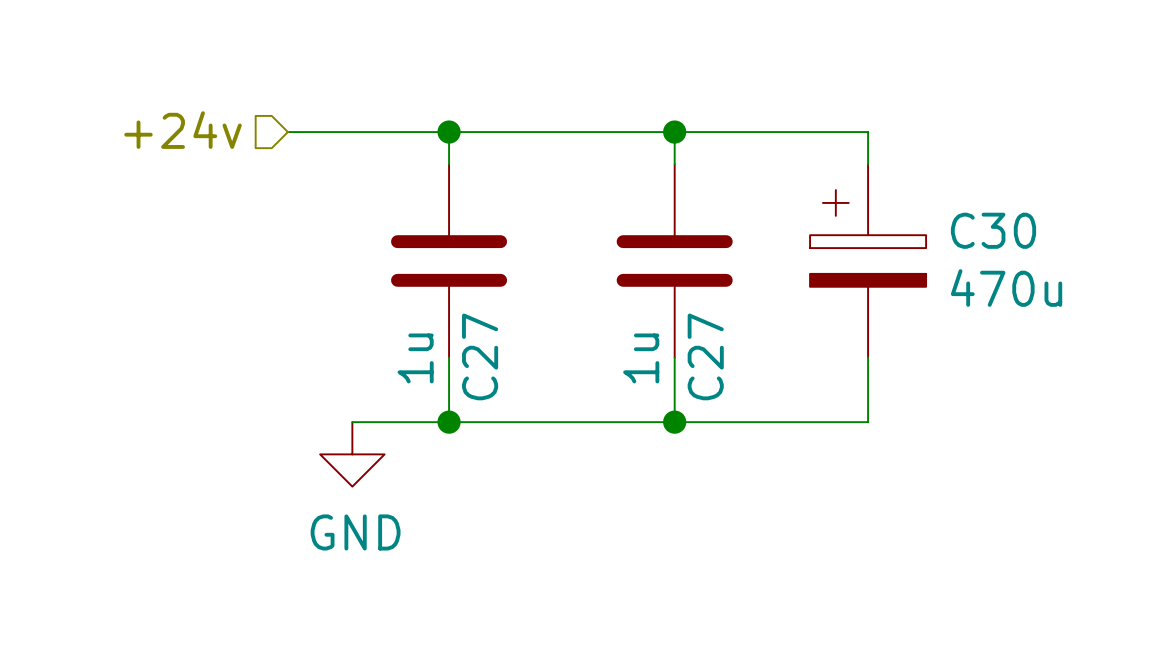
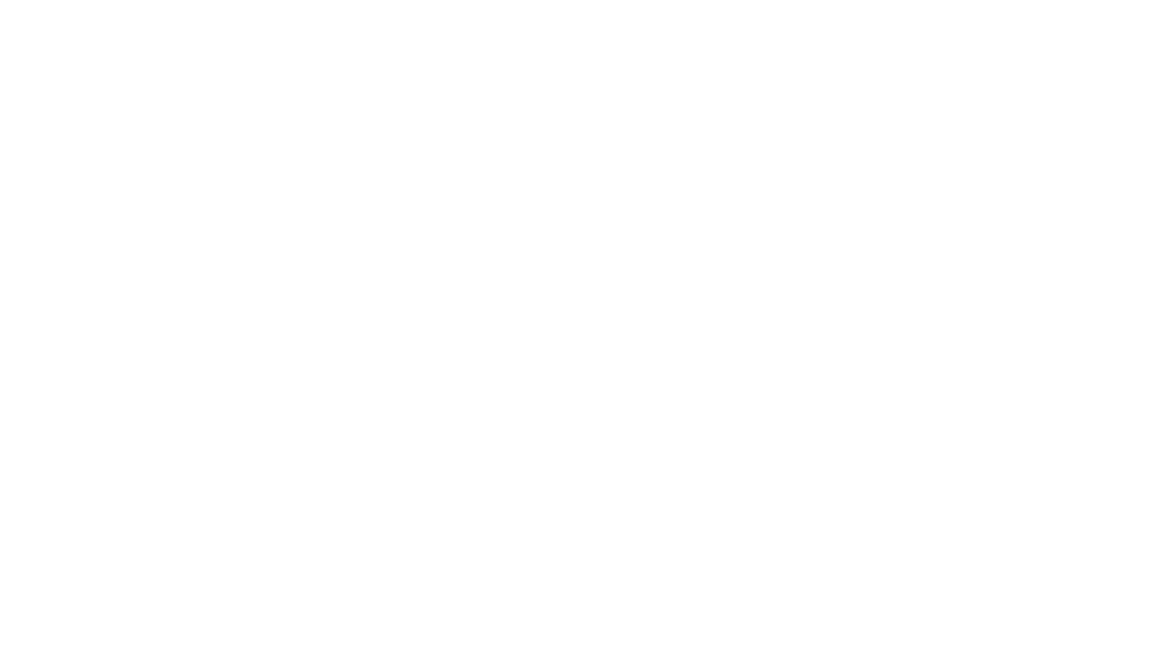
hierarchical label: +24v (183, 130) -> none
wire: (287, 132) (868, 132) (868, 164) -> none
wire: (449, 132) (449, 164) -> none
junction: (449, 132) -> none
wire: (674, 132) (674, 164) -> none
junction: (674, 132) -> none
C27: 1u (449, 260) -> none
C27: 1u (674, 260) -> none
C30: 470u (868, 260) -> none
wire: (449, 357) (449, 422) -> none
wire: (674, 357) (674, 422) -> none
wire: (868, 357) (868, 422) (352, 422) -> none
junction: (449, 422) -> none
junction: (674, 422) -> none
power symbol: GND (352, 454) -> none

